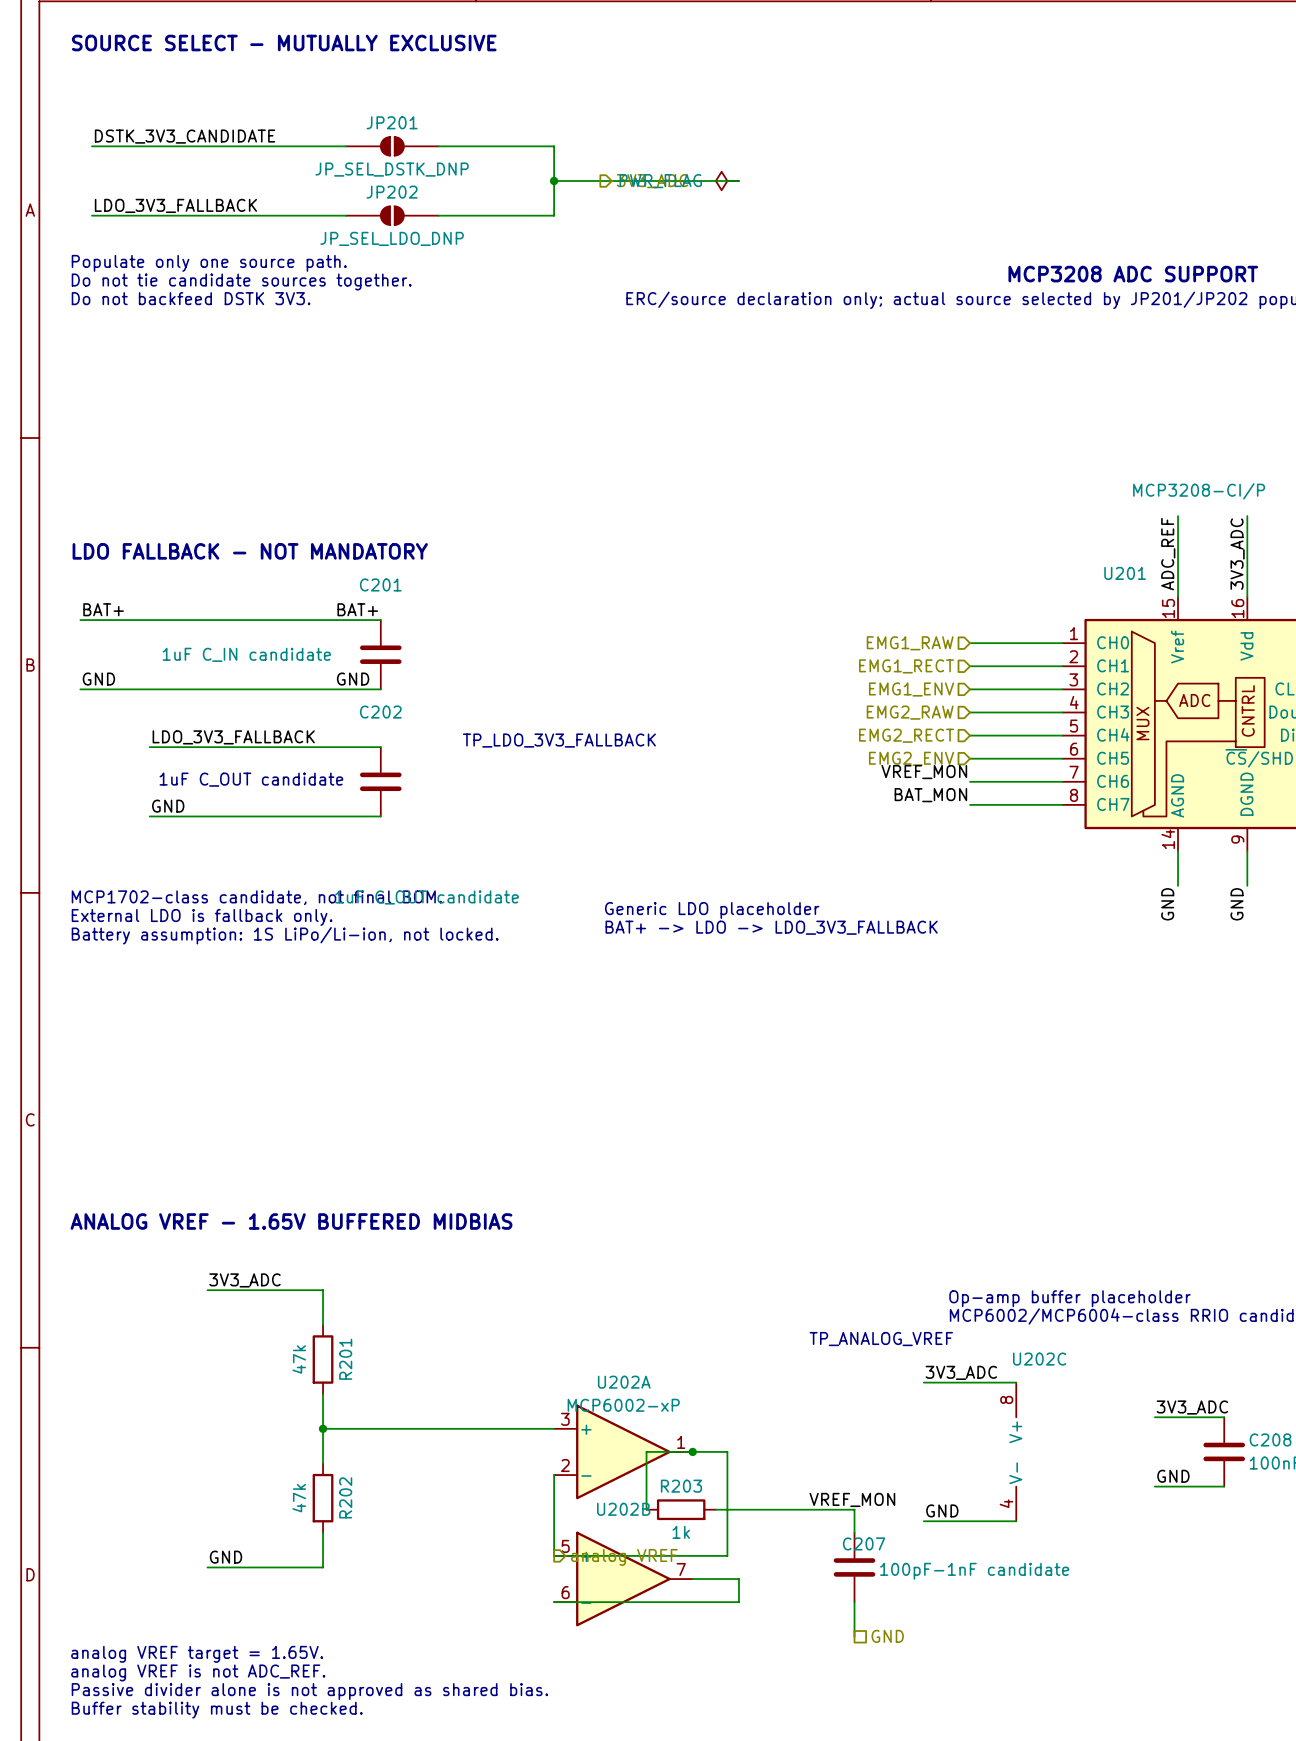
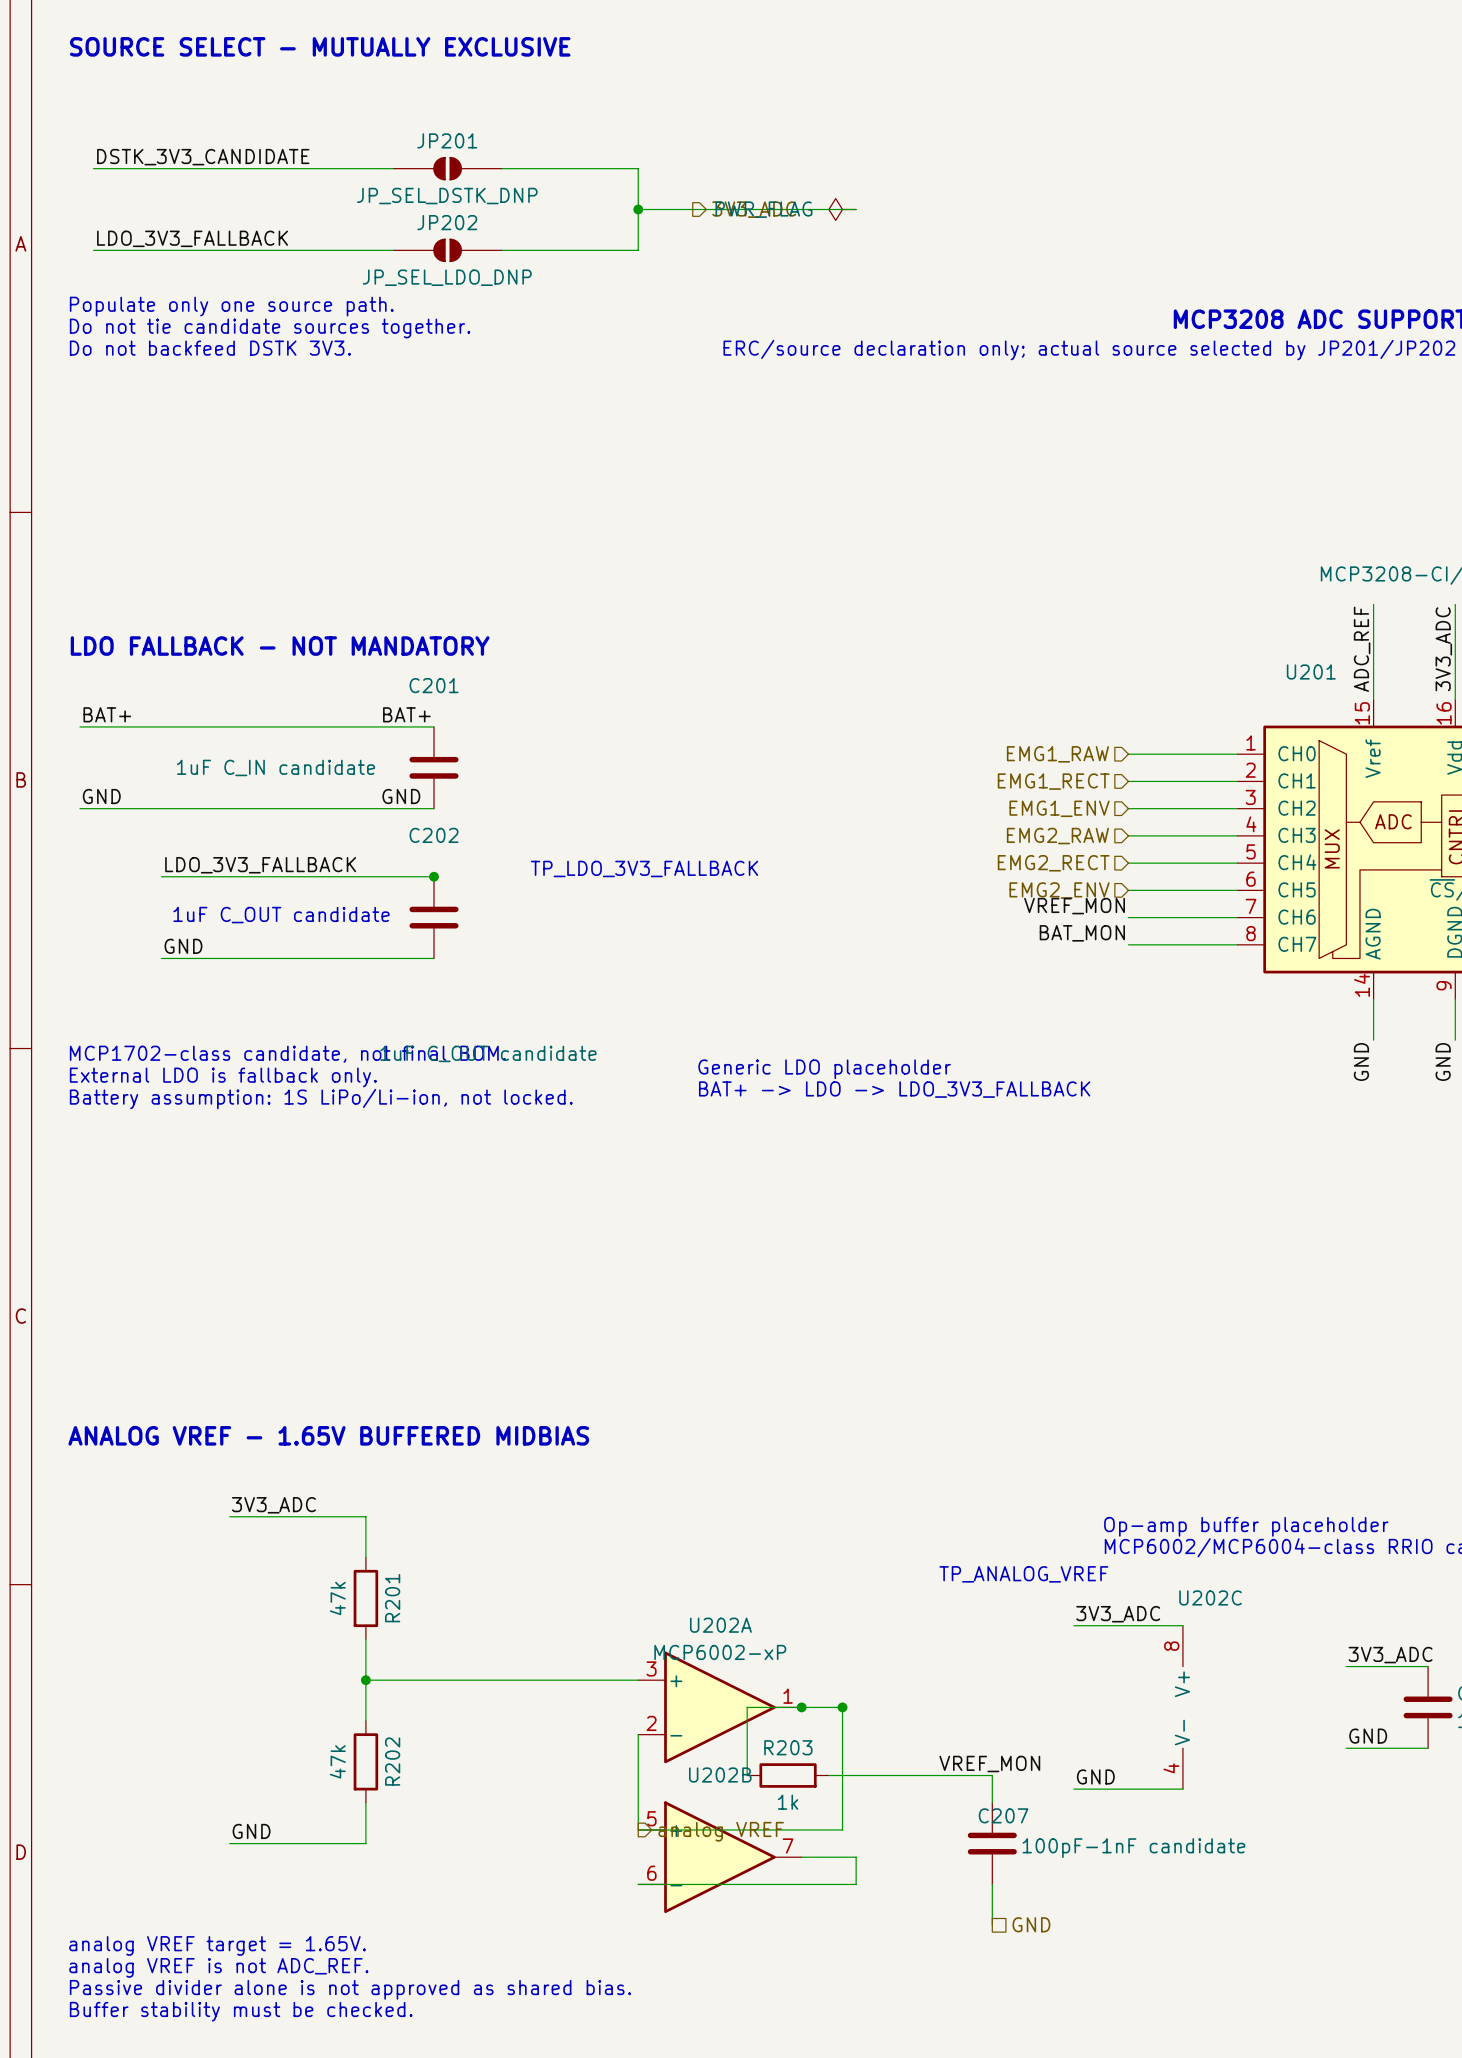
junction: none -> (434, 876)
junction: none -> (842, 1707)

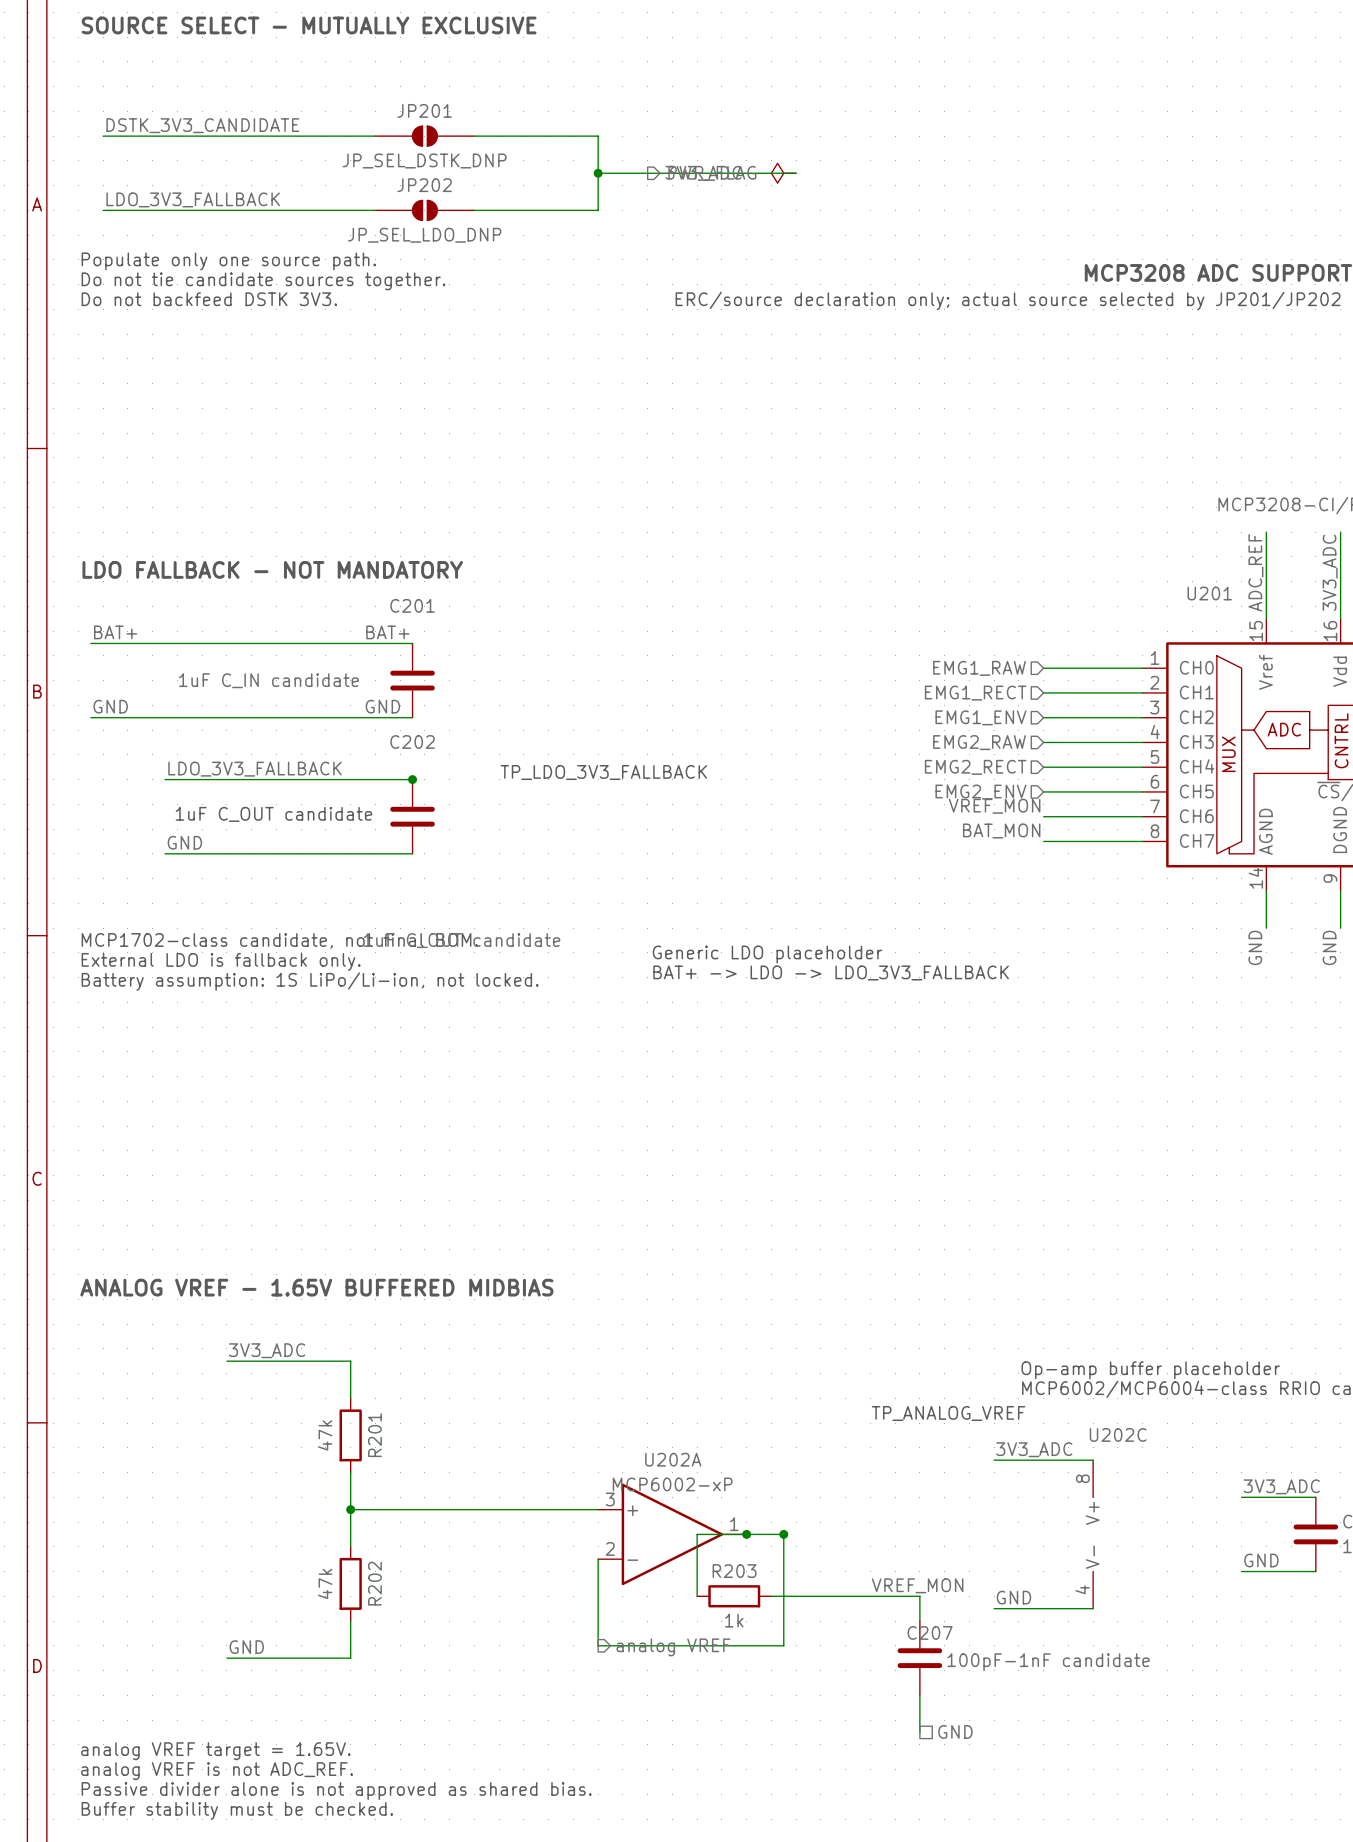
U202B: (719, 1857) -> none
wire: (801, 1857) (856, 1857) (856, 1884) (638, 1884) -> none

